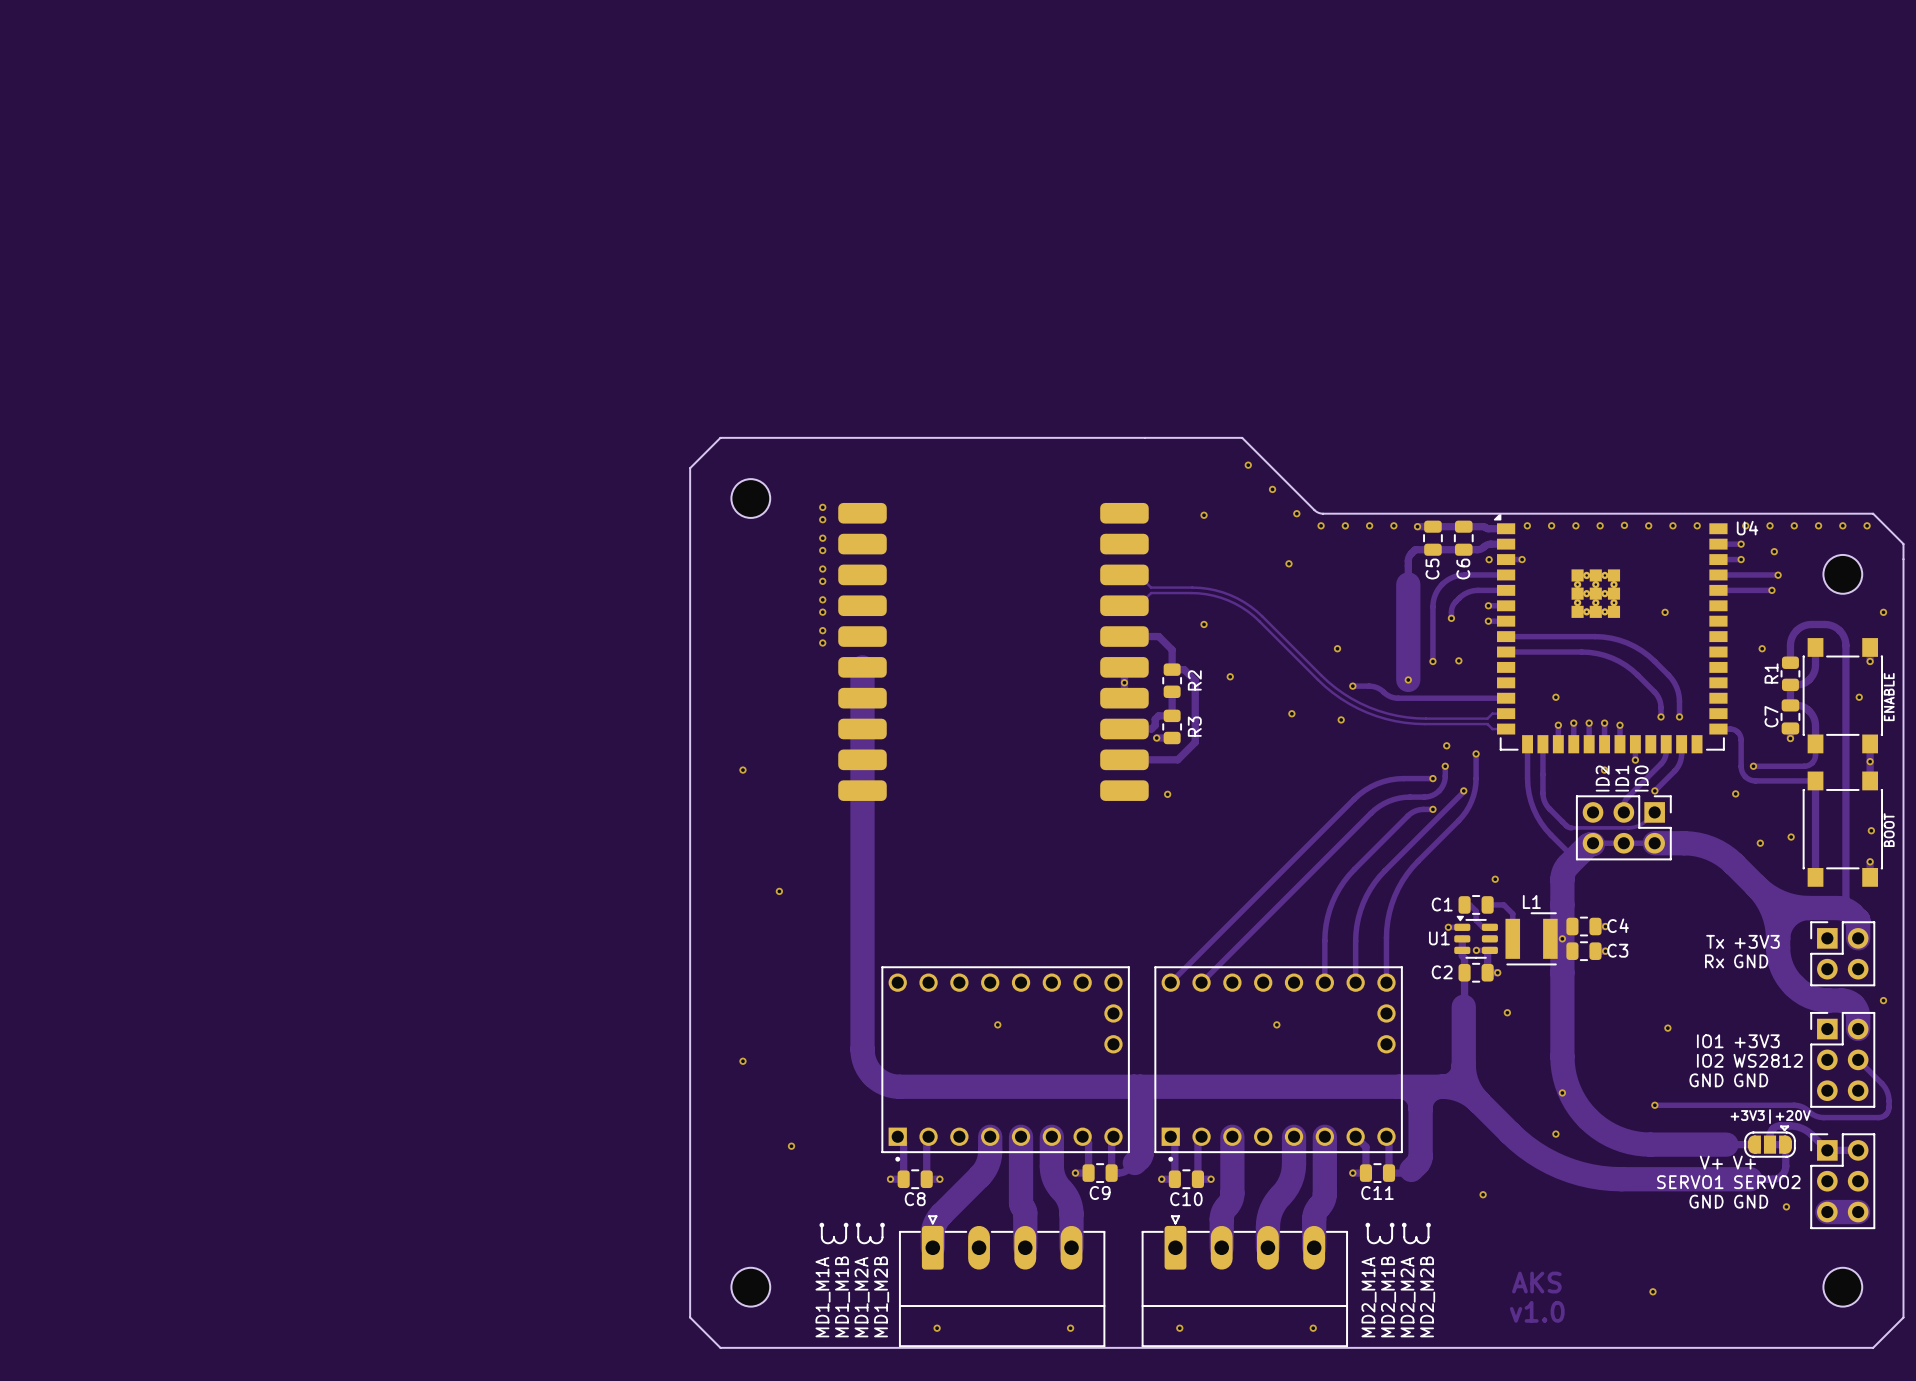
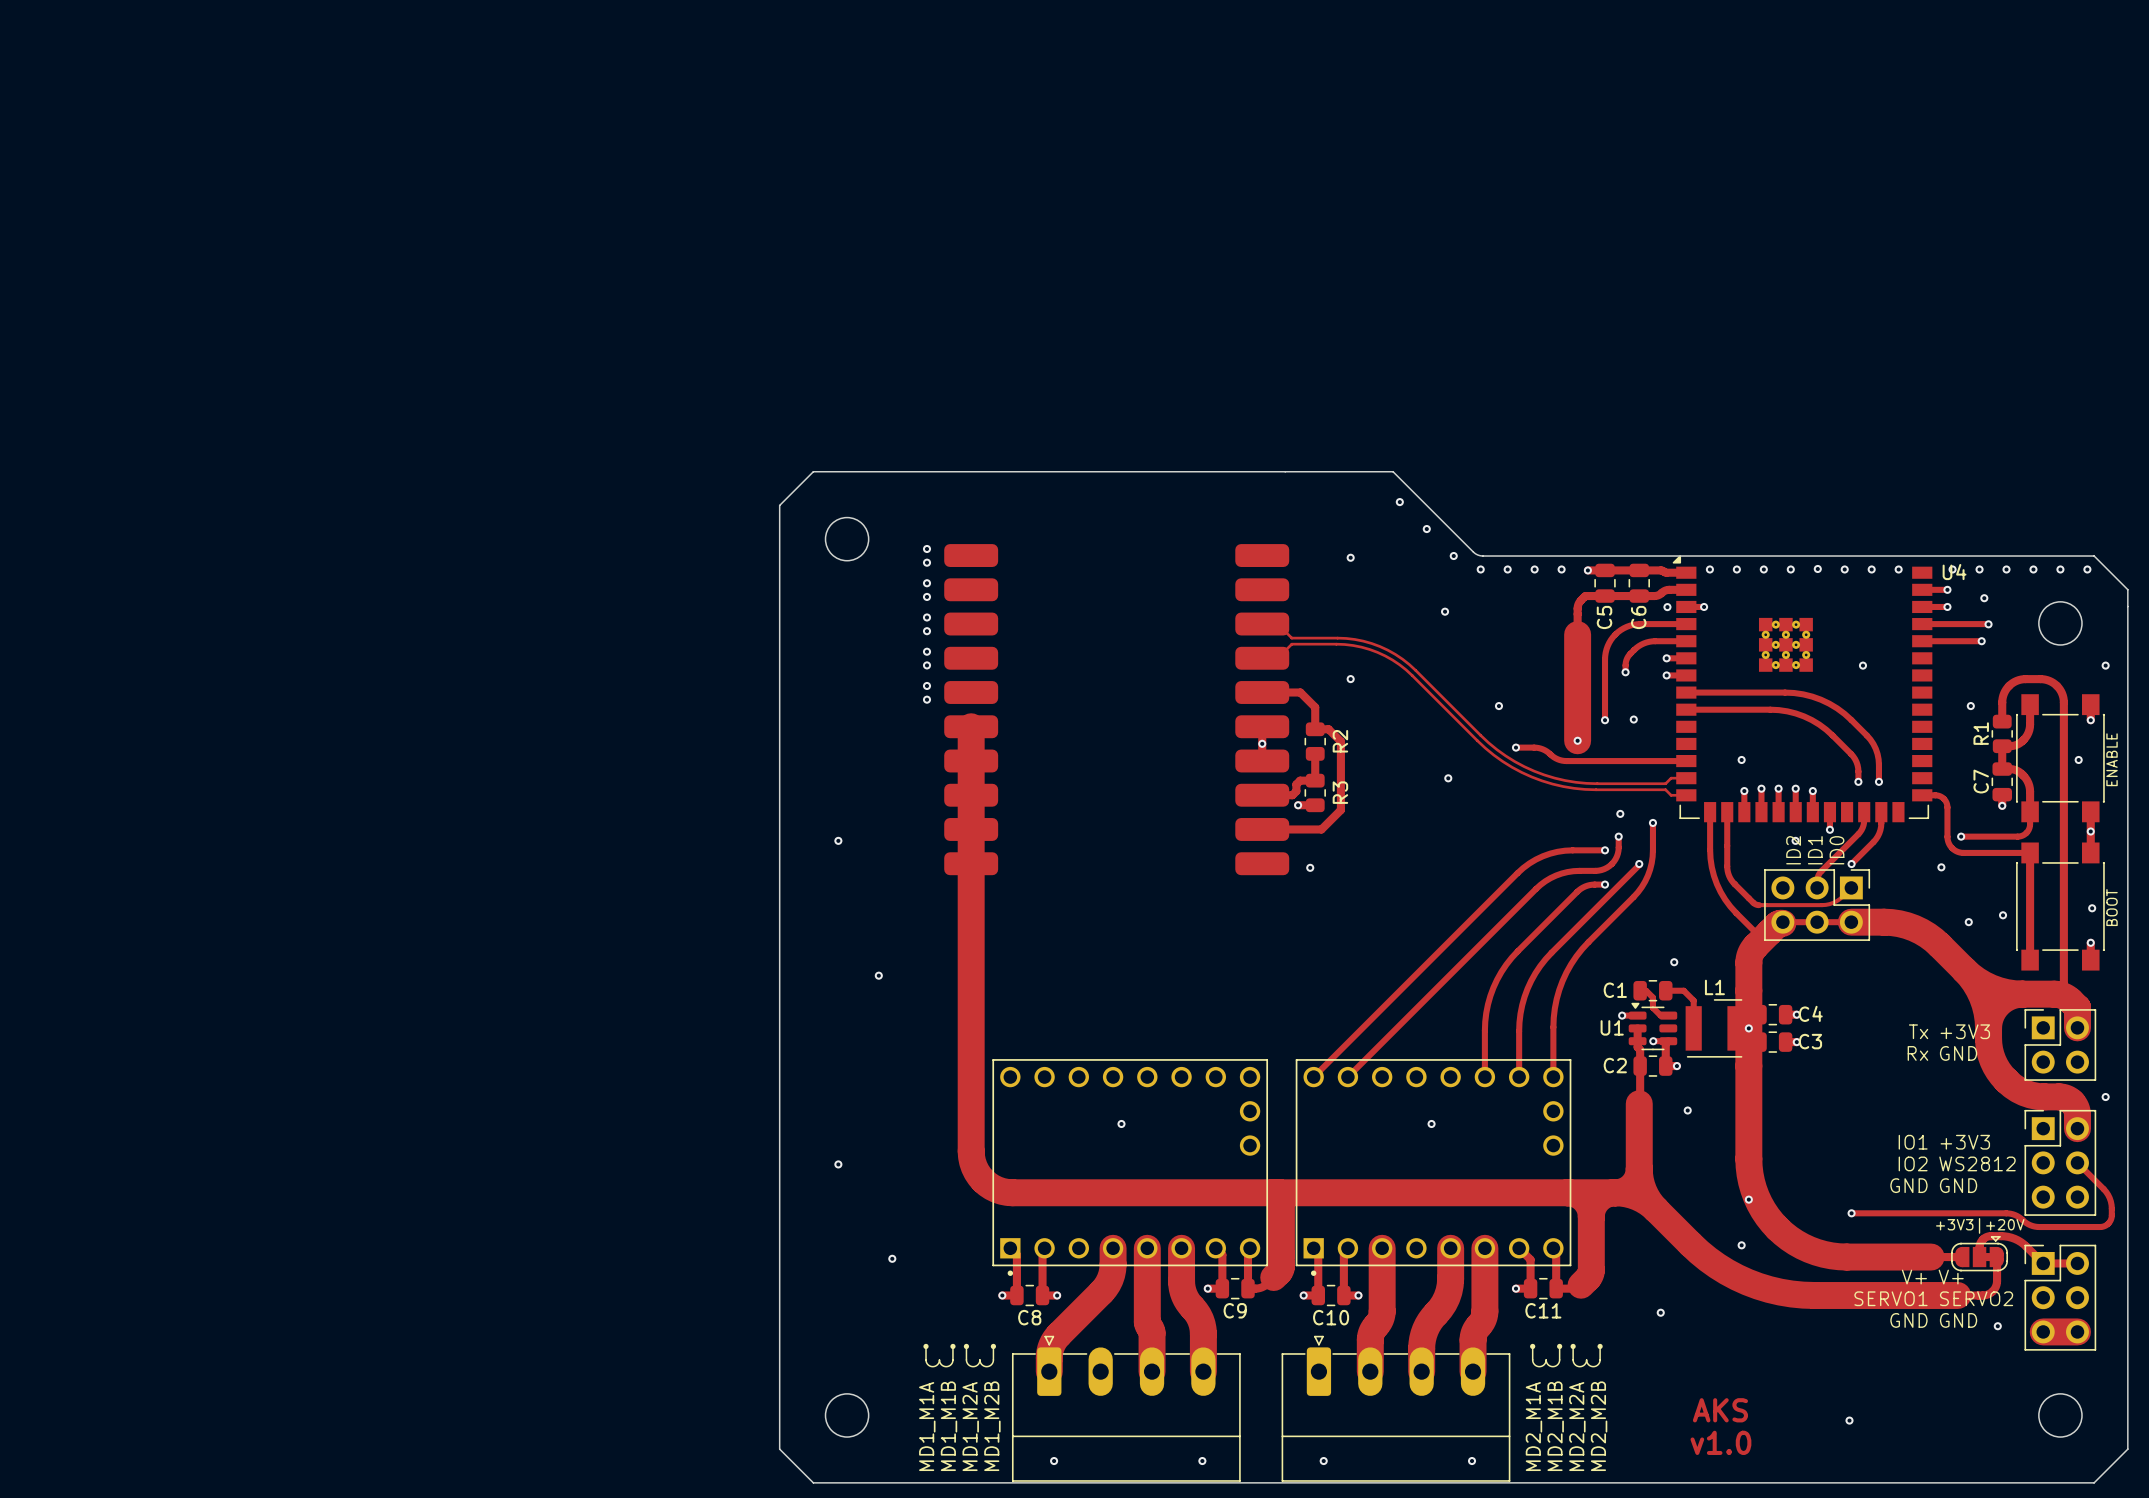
via: (1230, 676) -> none
via: (1341, 719) -> none
via: (1667, 1028) -> none

